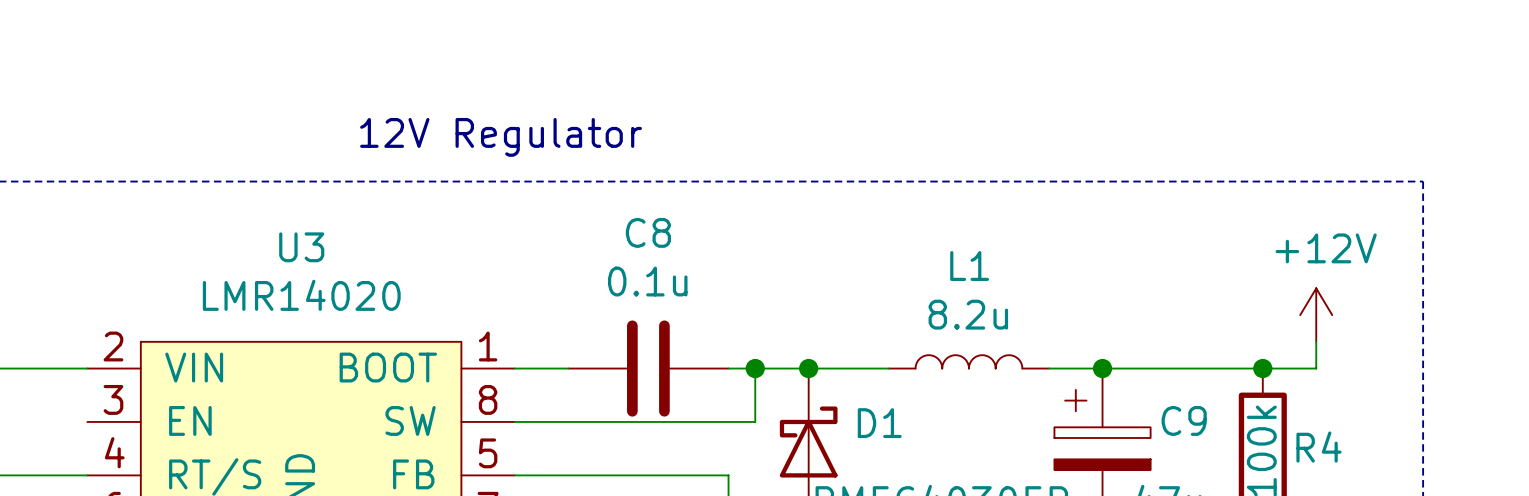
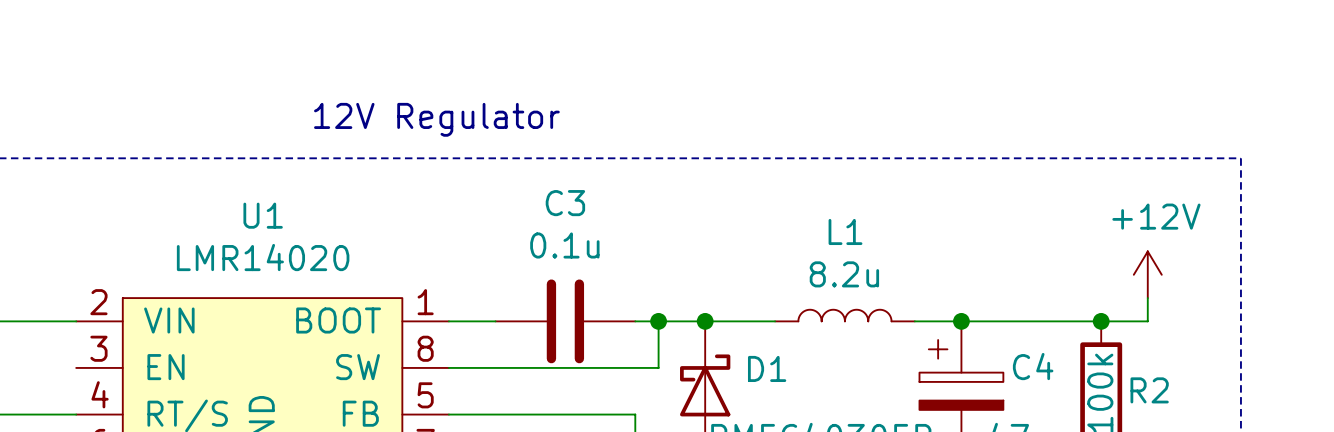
C8 name: C8 (648, 232) -> C3 (565, 203)
U3 name: U3 (301, 247) -> U1 (263, 215)
C9 name: C9 (1184, 420) -> C4 (1033, 366)
R4 name: R4 (1318, 447) -> R2 (1149, 390)

